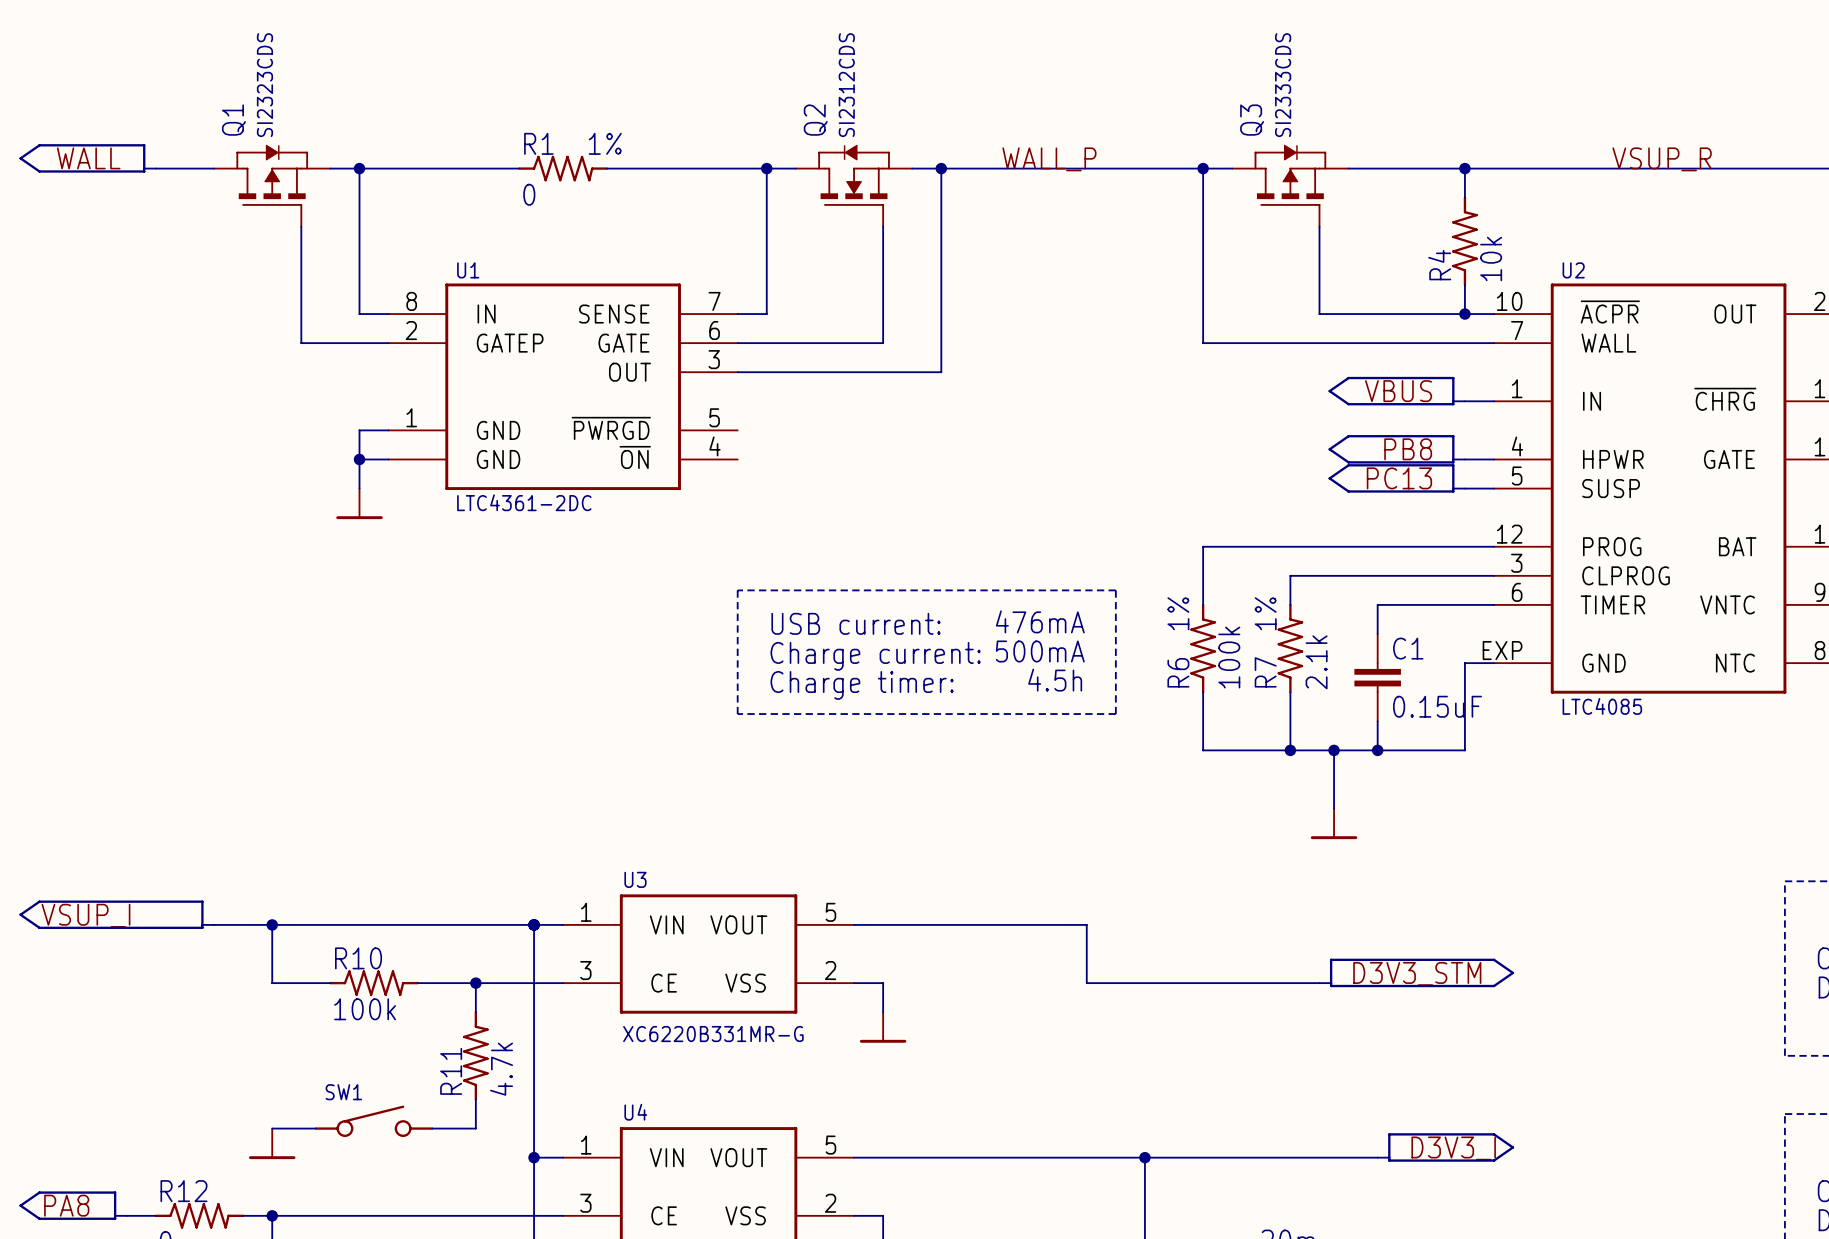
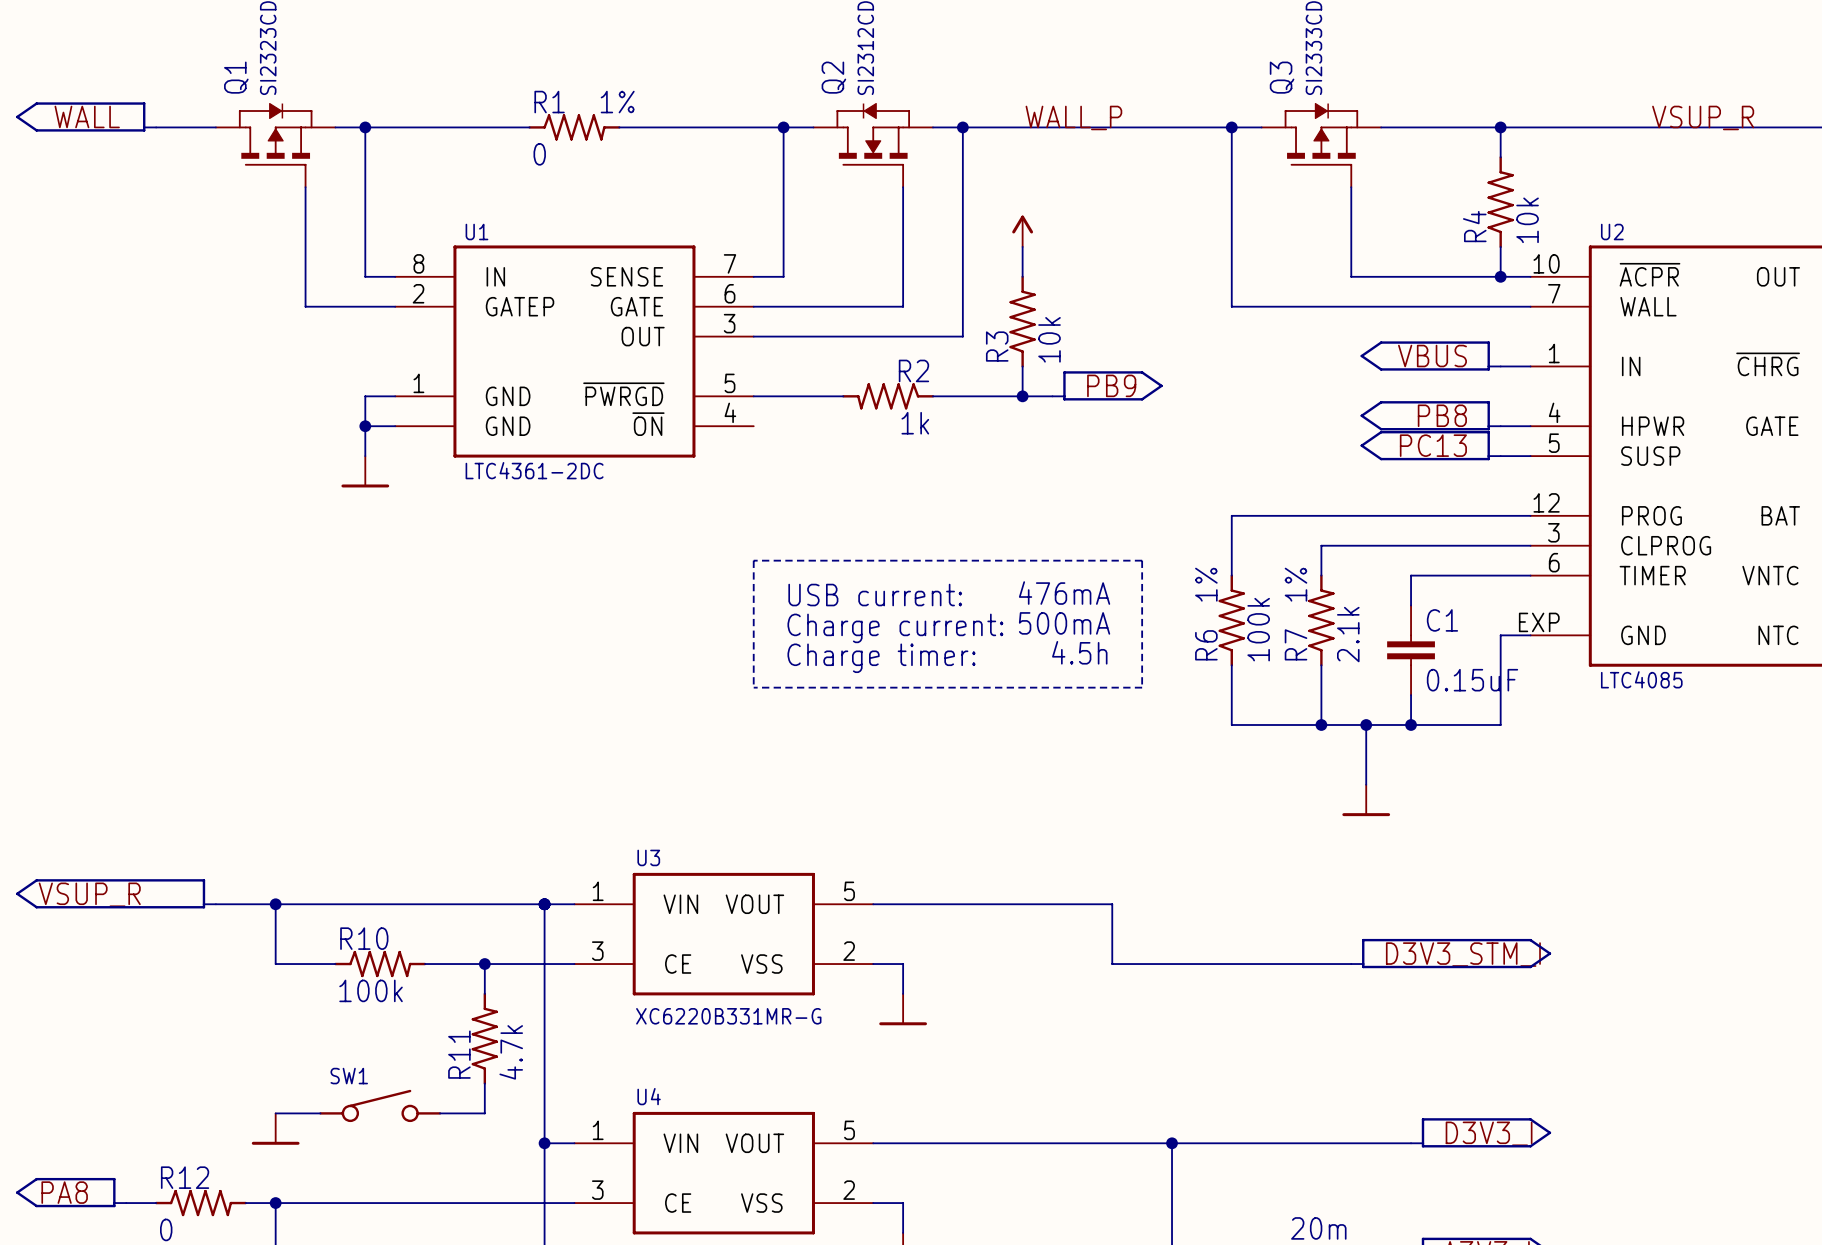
power symbol: none -> (1022, 231)
wire: none -> (1022, 246) (1022, 276)
R3: none -> 10k (1022, 321)
wire: none -> (1022, 366) (1022, 396)
part: none -> (1107, 385)
label: none -> PB9 (1111, 385)
wire: none -> (753, 396) (843, 396)
R2: none -> 1k (888, 396)
wire: none -> (932, 396) (1052, 396)
junction: none -> (1022, 396)
label: VSUP_I (85, 915) -> VSUP_R (89, 894)
label: D3V3_STM (1417, 973) -> D3V3_STM_I (1463, 954)

